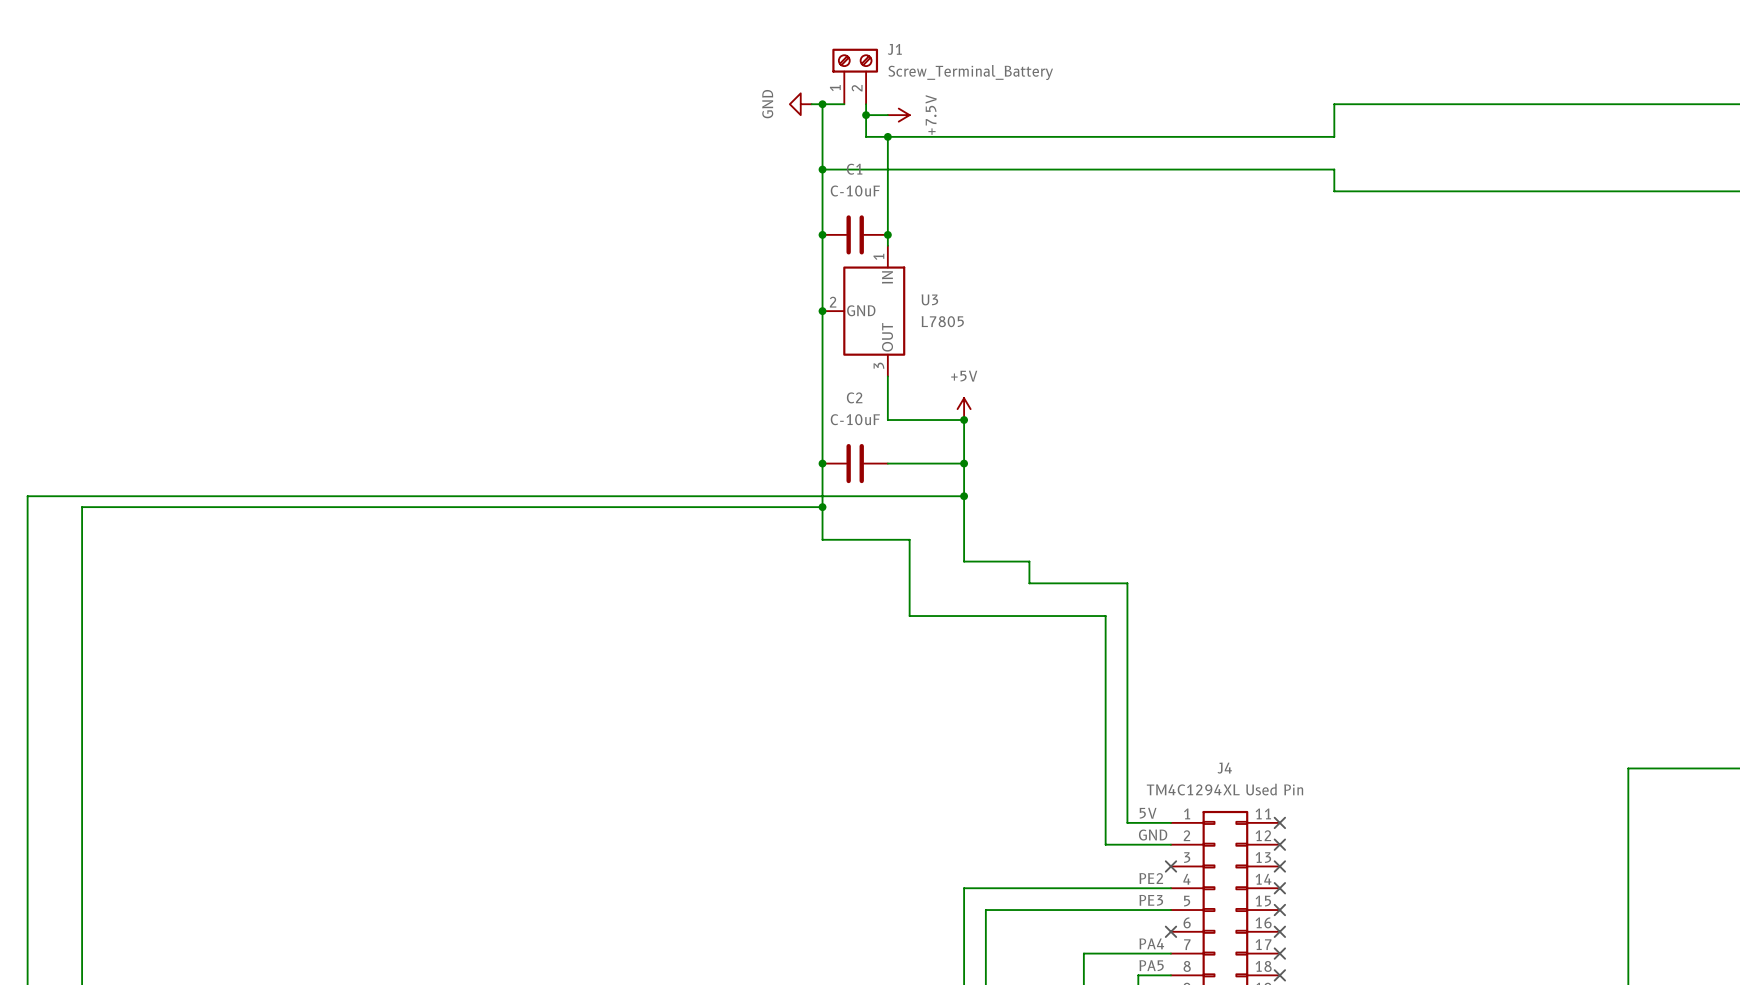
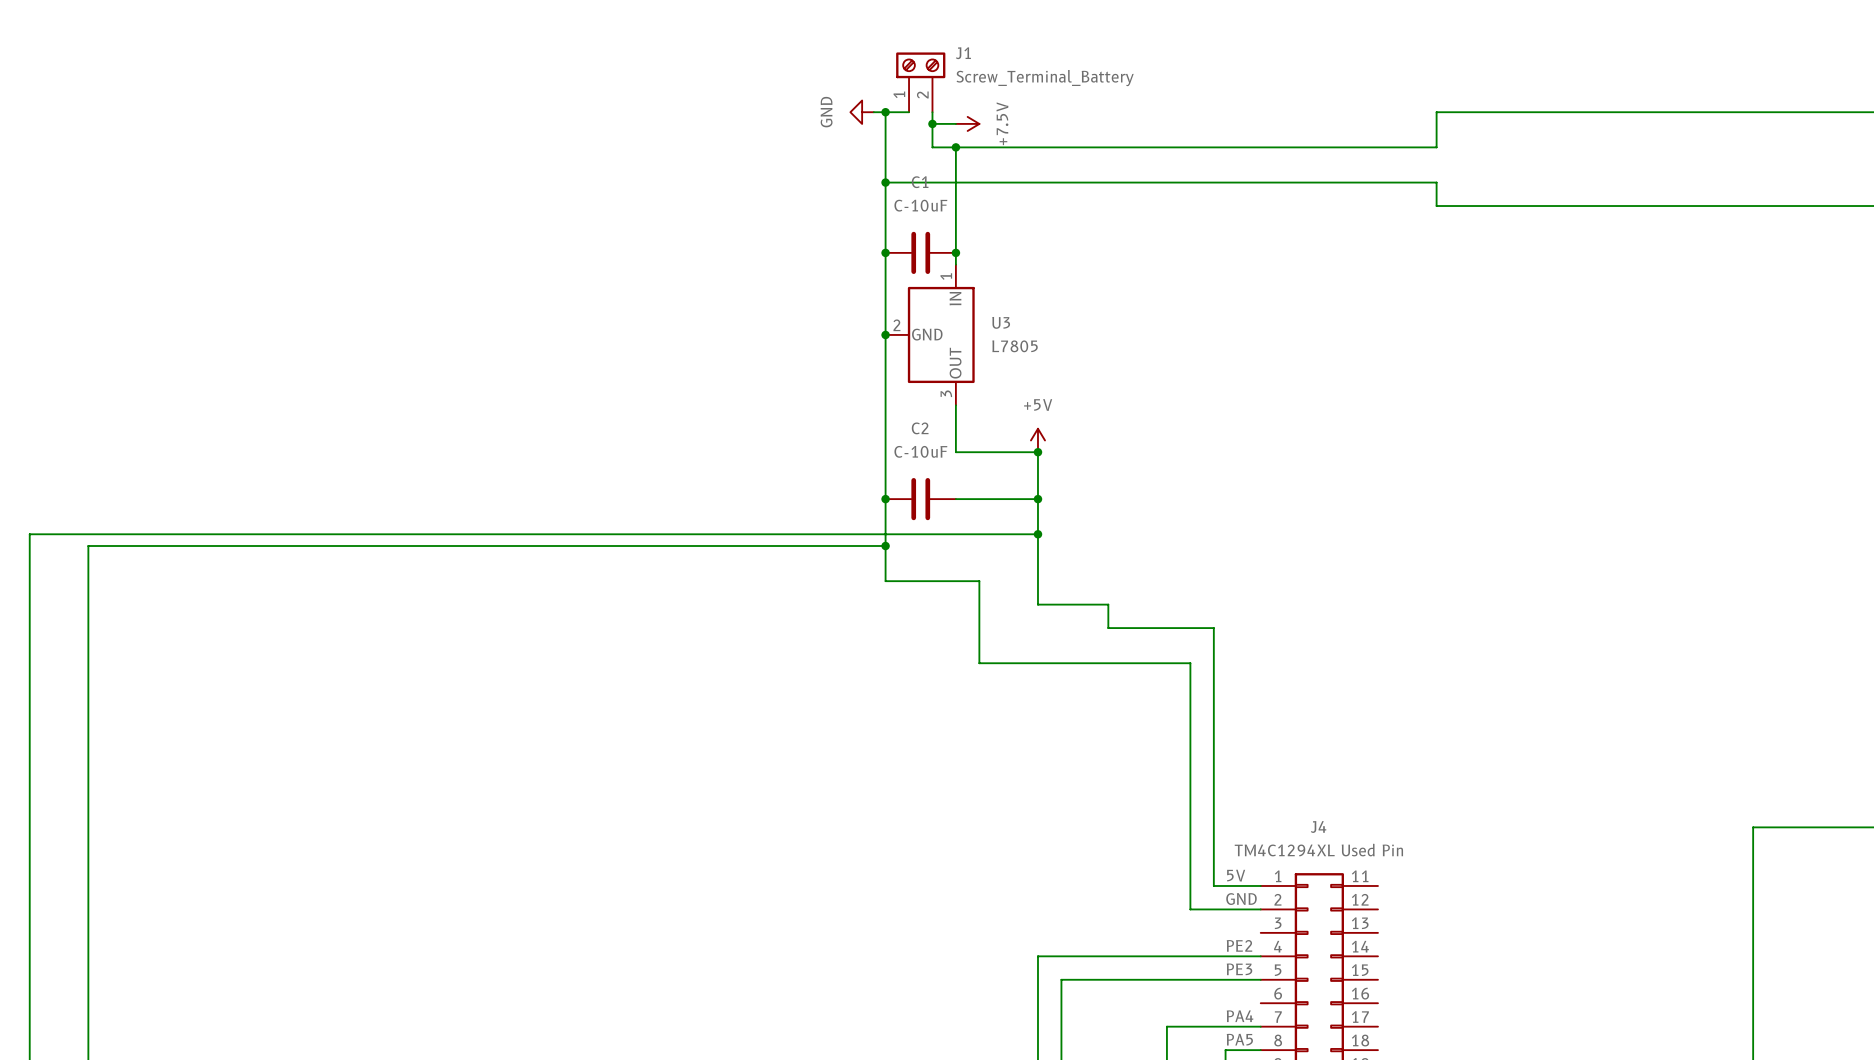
no-connect mark: (1279, 822) -> none
no-connect mark: (1279, 844) -> none
no-connect mark: (1170, 866) -> none
no-connect mark: (1279, 866) -> none
no-connect mark: (1279, 888) -> none
no-connect mark: (1279, 910) -> none
no-connect mark: (1170, 931) -> none
no-connect mark: (1279, 931) -> none
no-connect mark: (1279, 953) -> none
no-connect mark: (1279, 975) -> none

